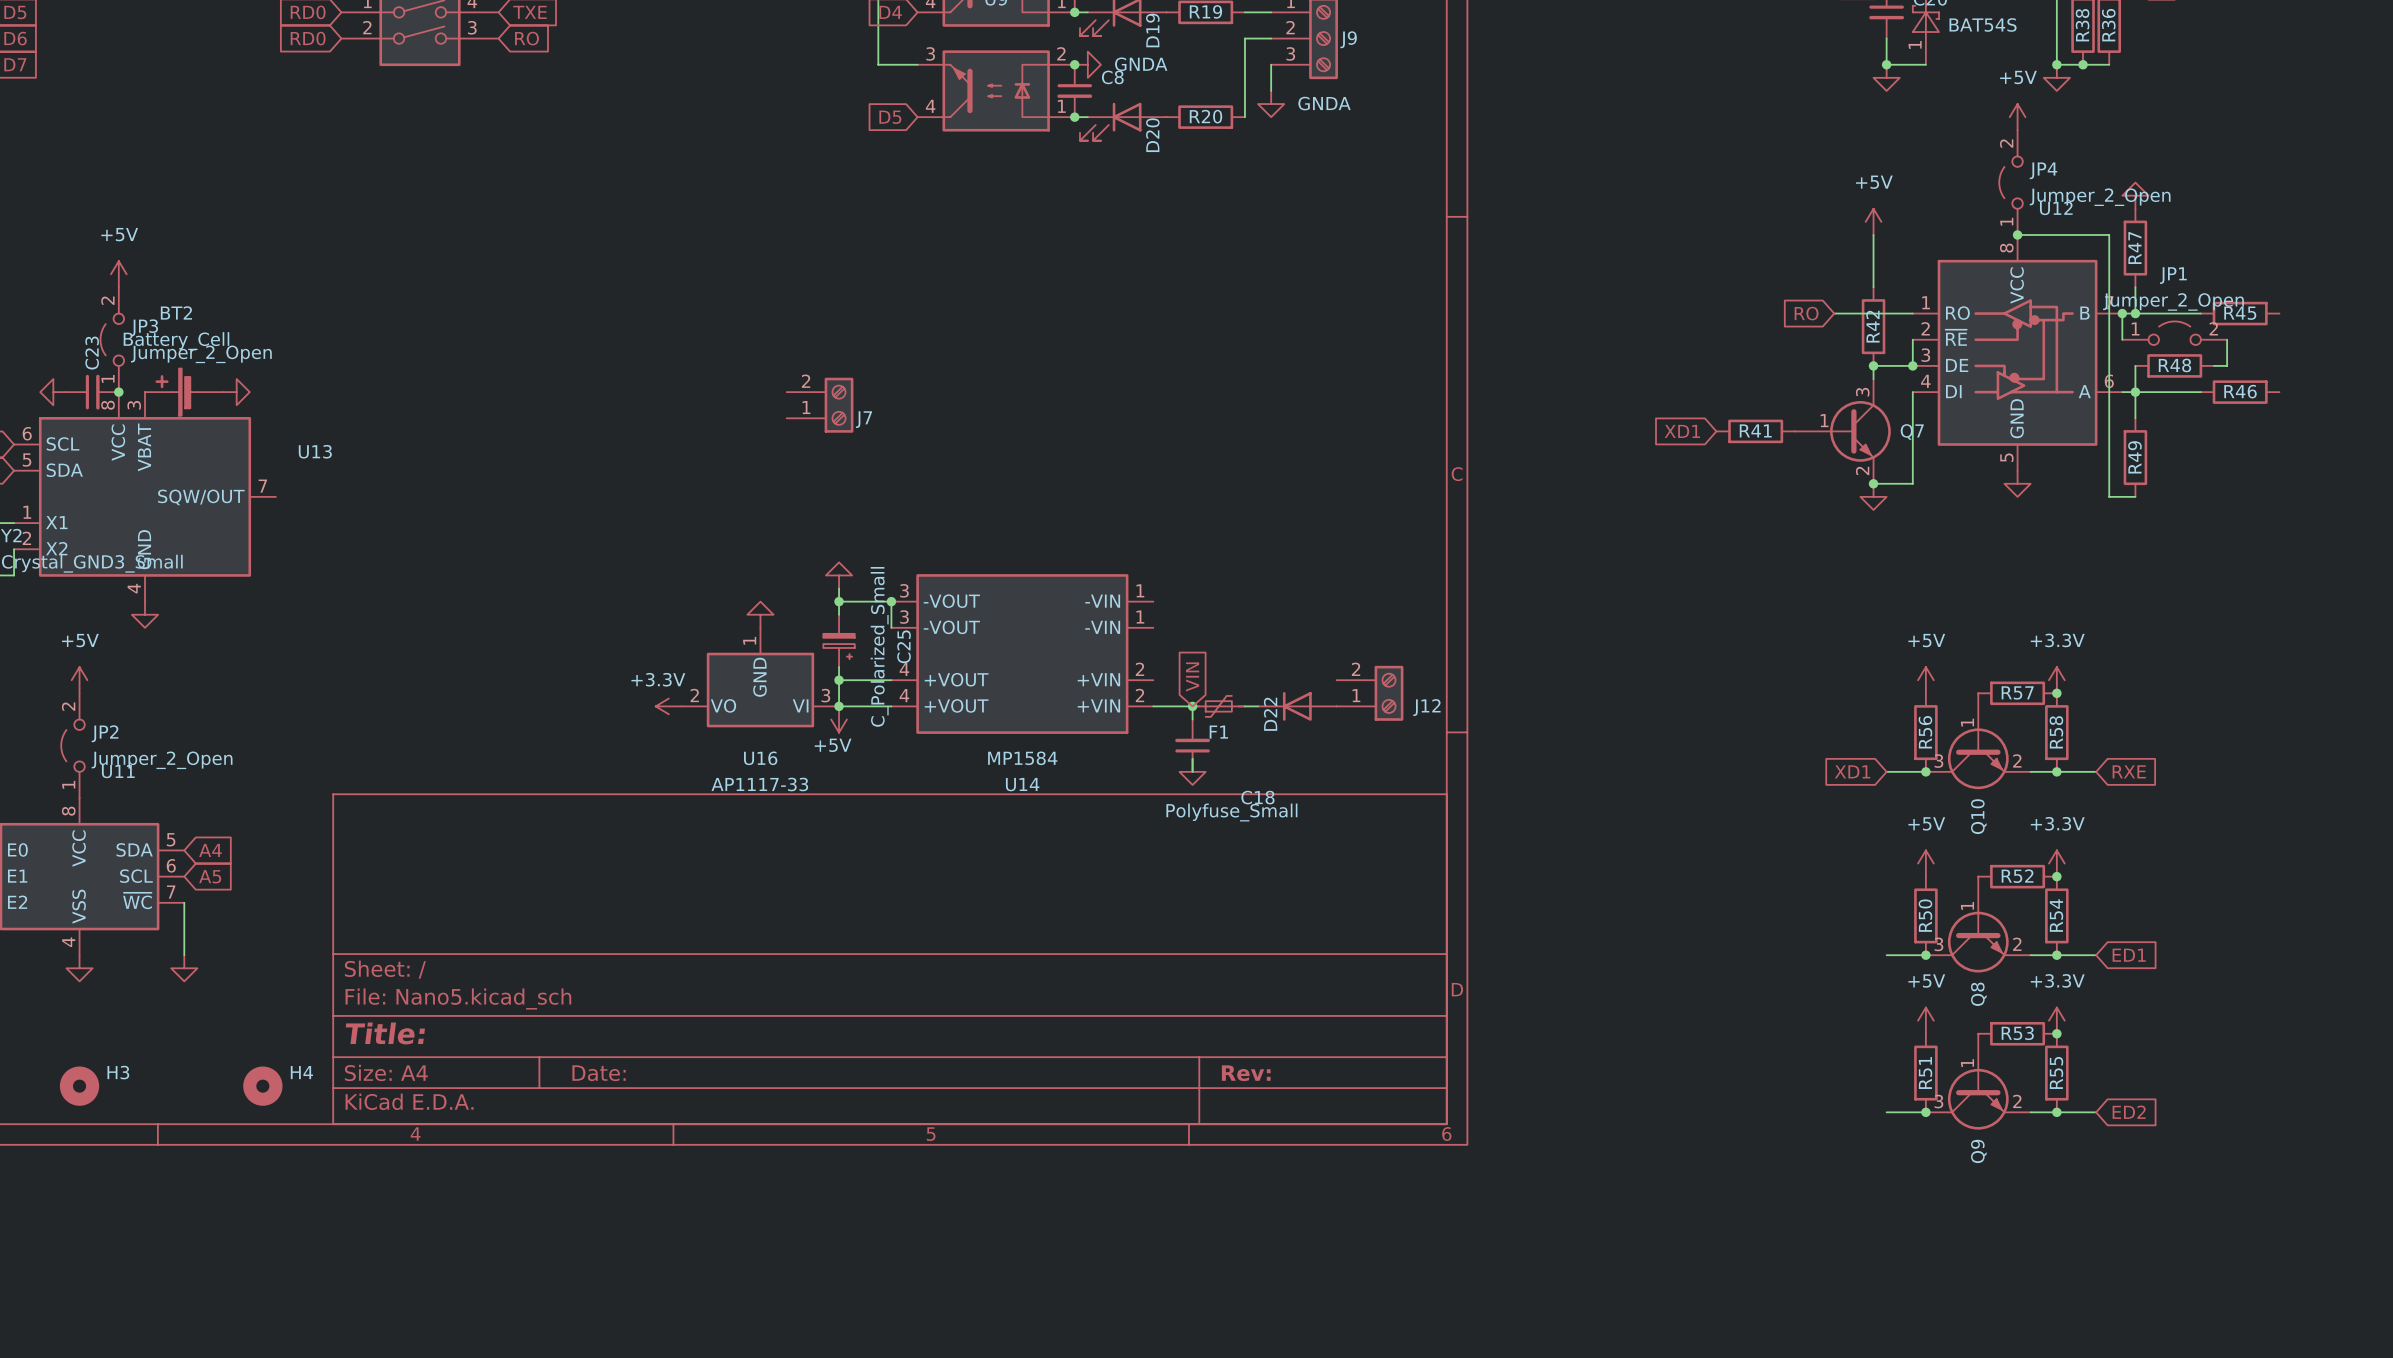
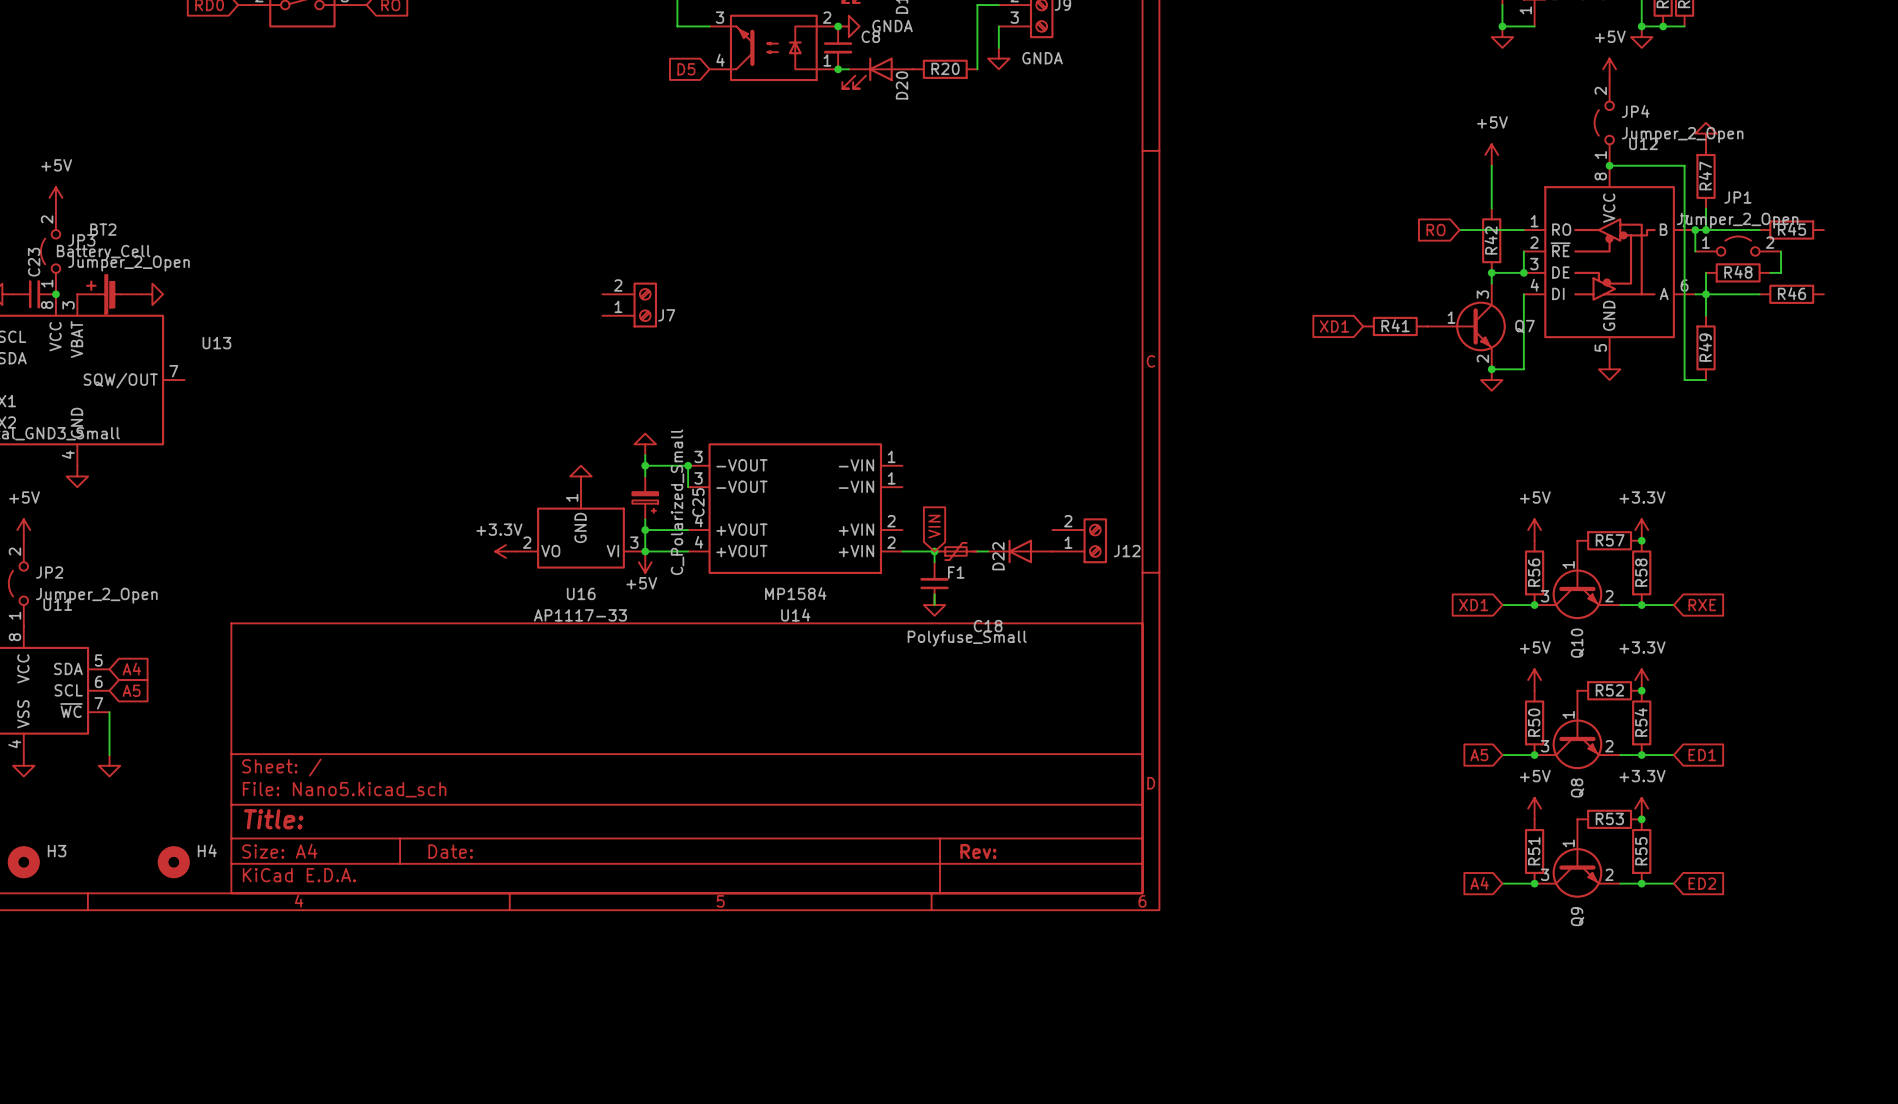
global label: none -> A5 (1479, 755)
global label: none -> A4 (1479, 883)

